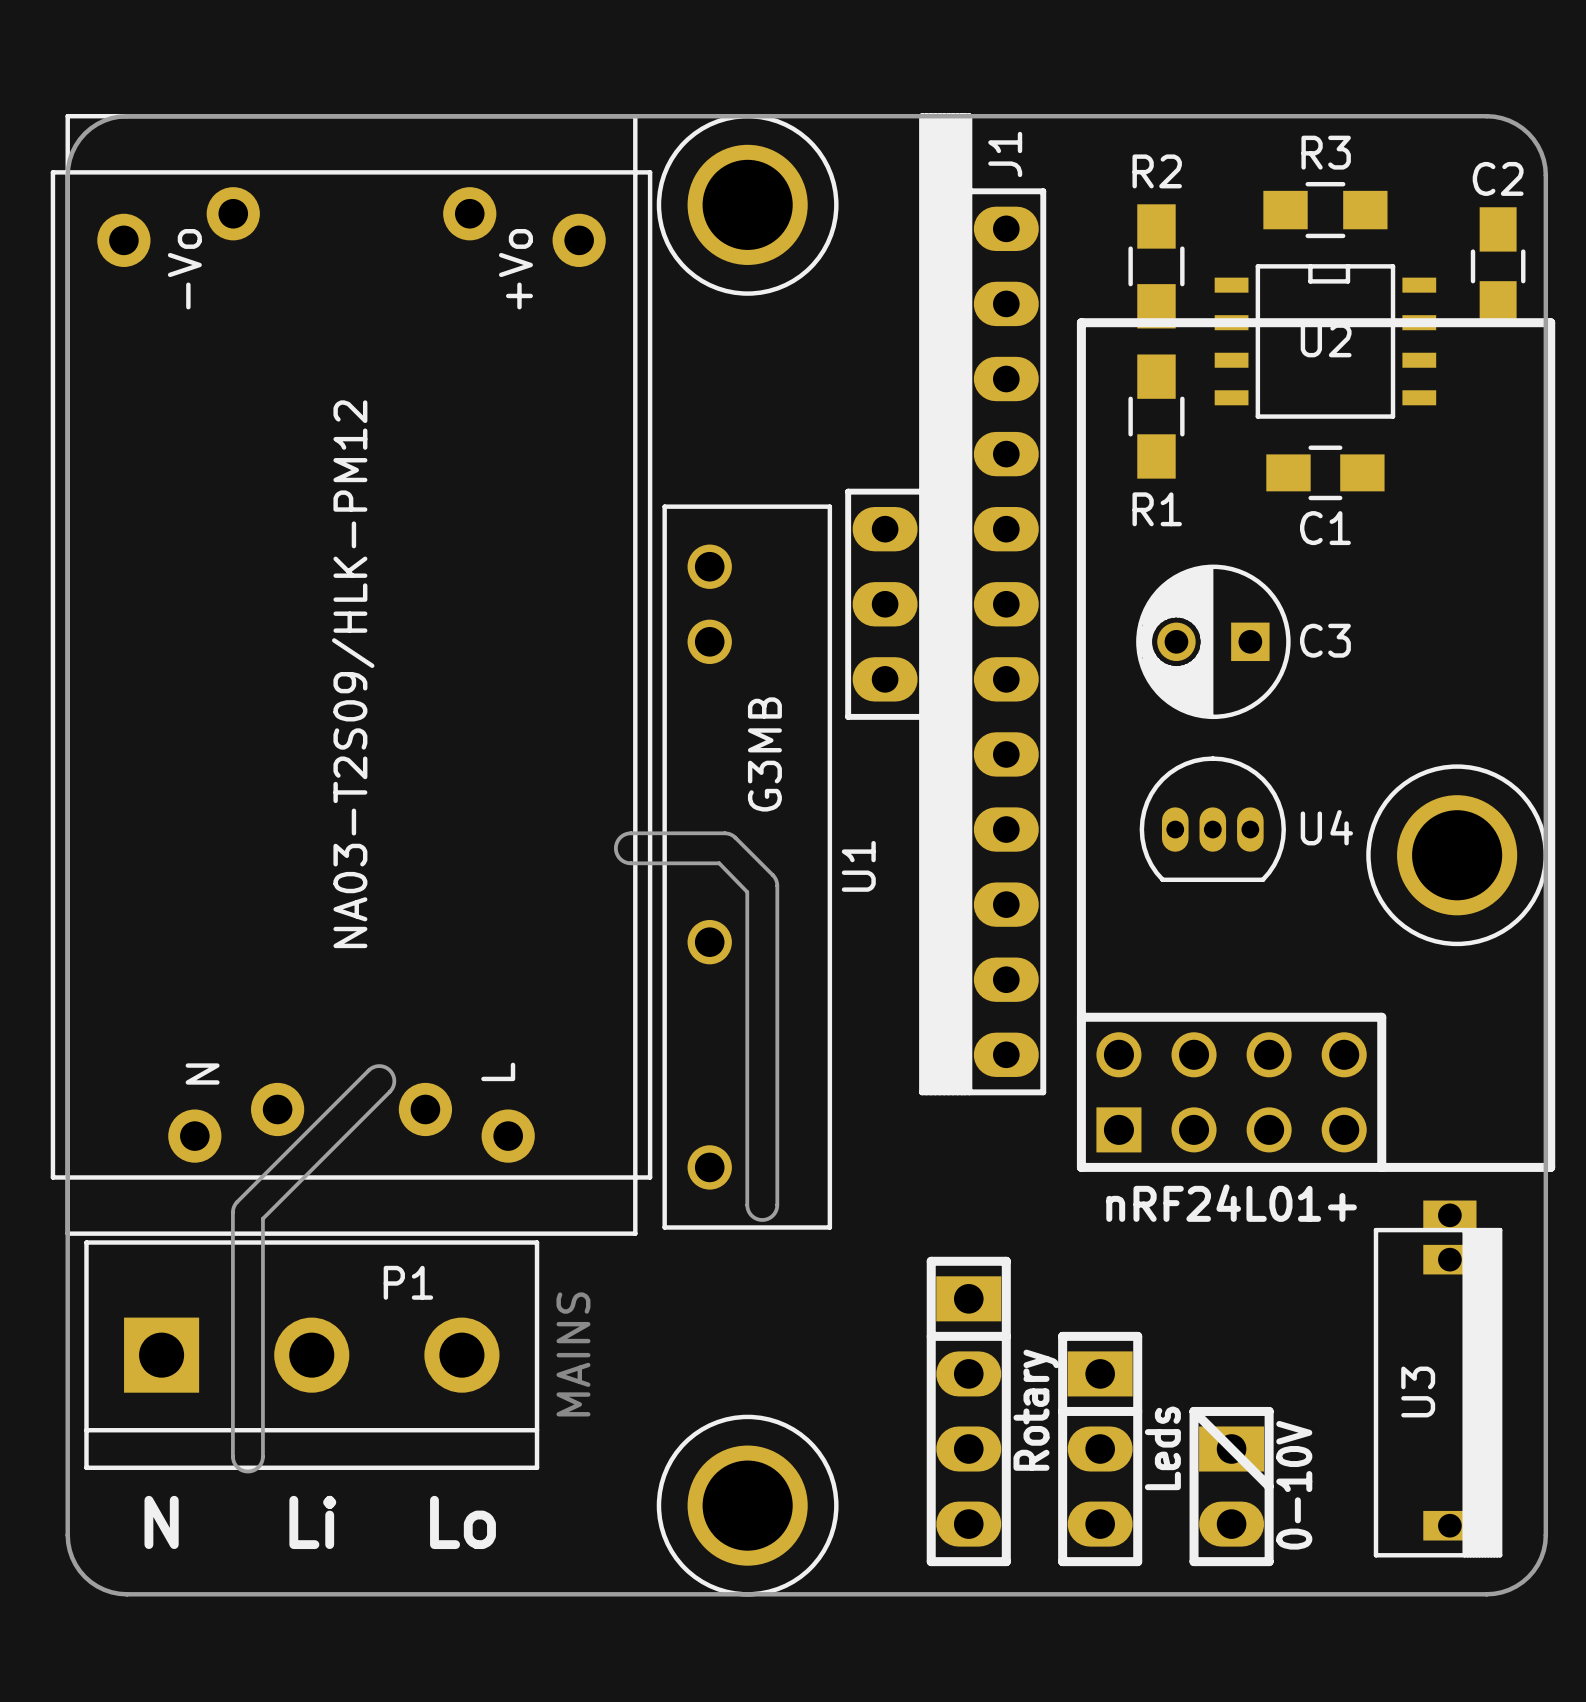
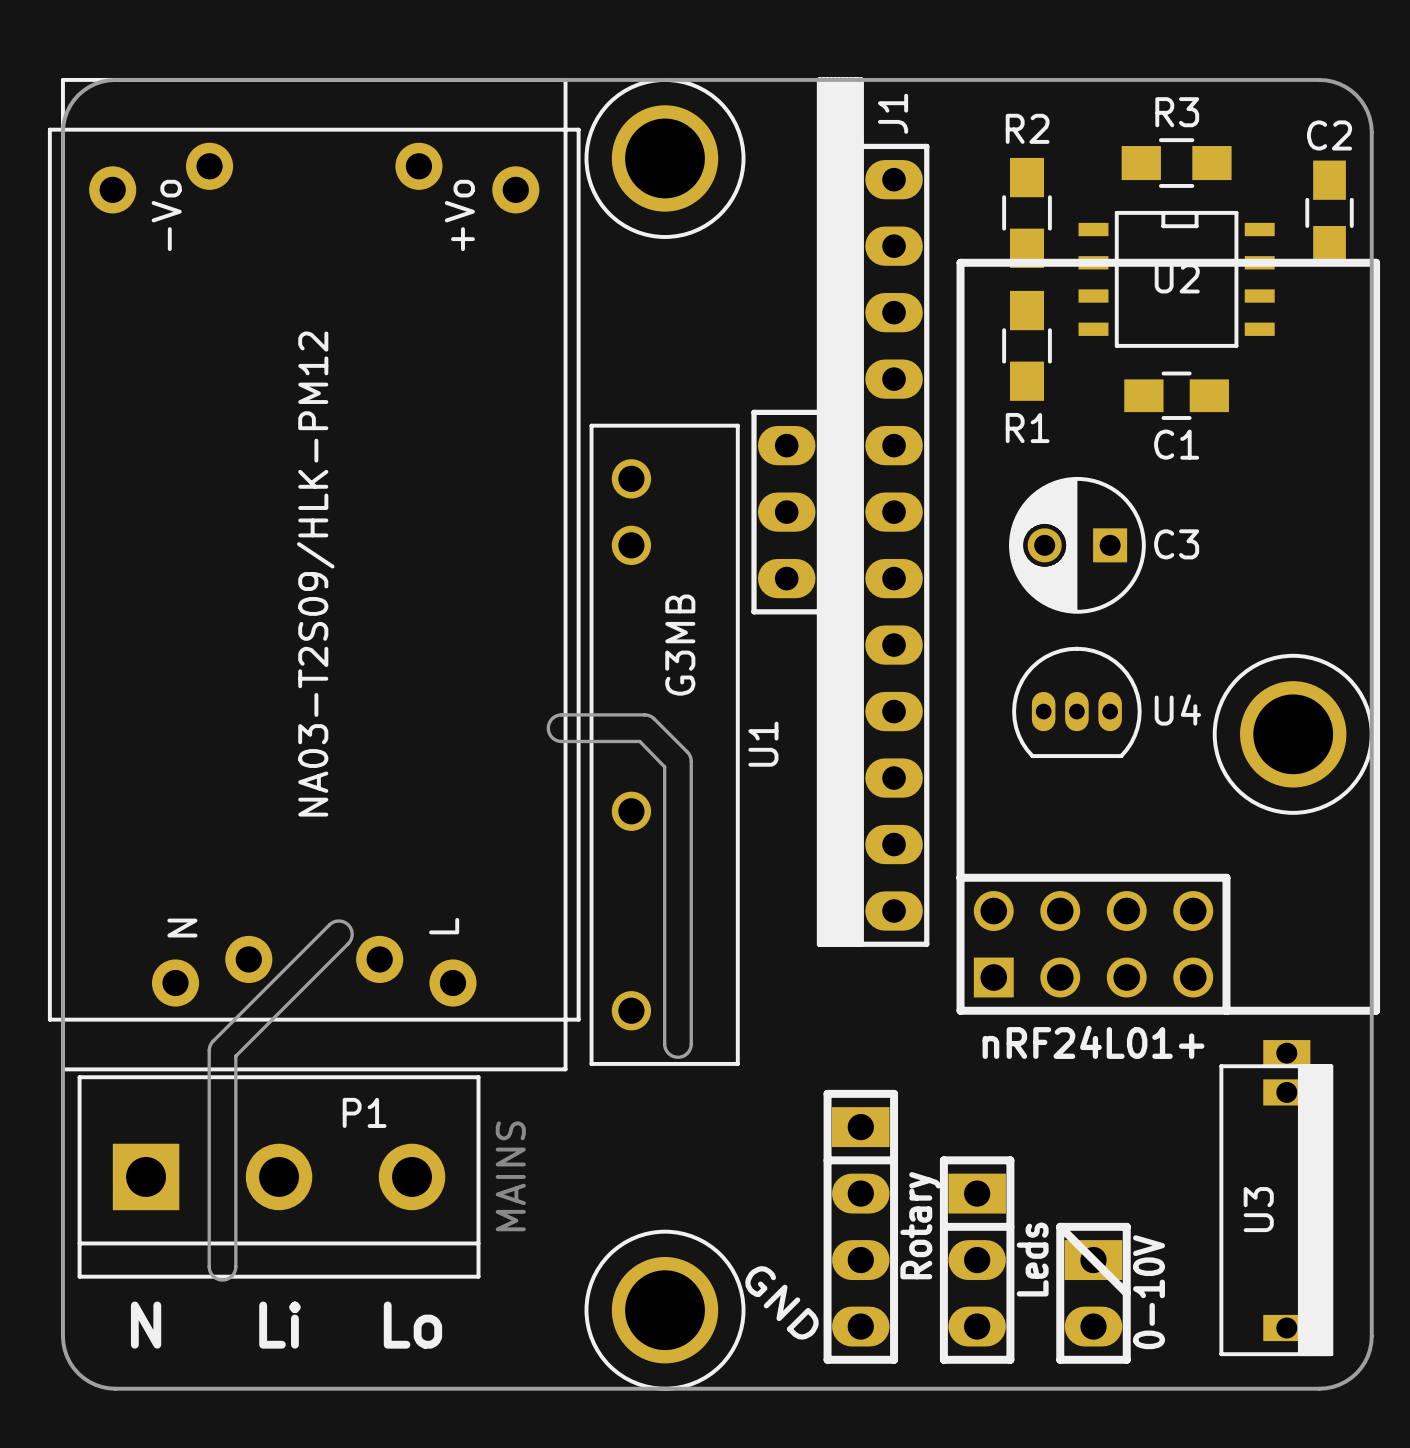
text: none -> GND (781, 1302)

